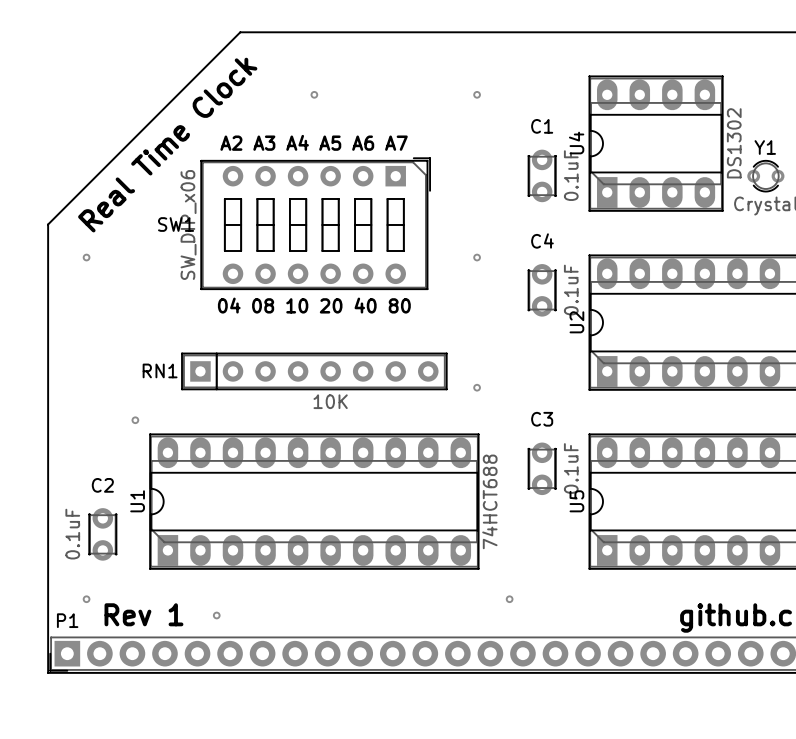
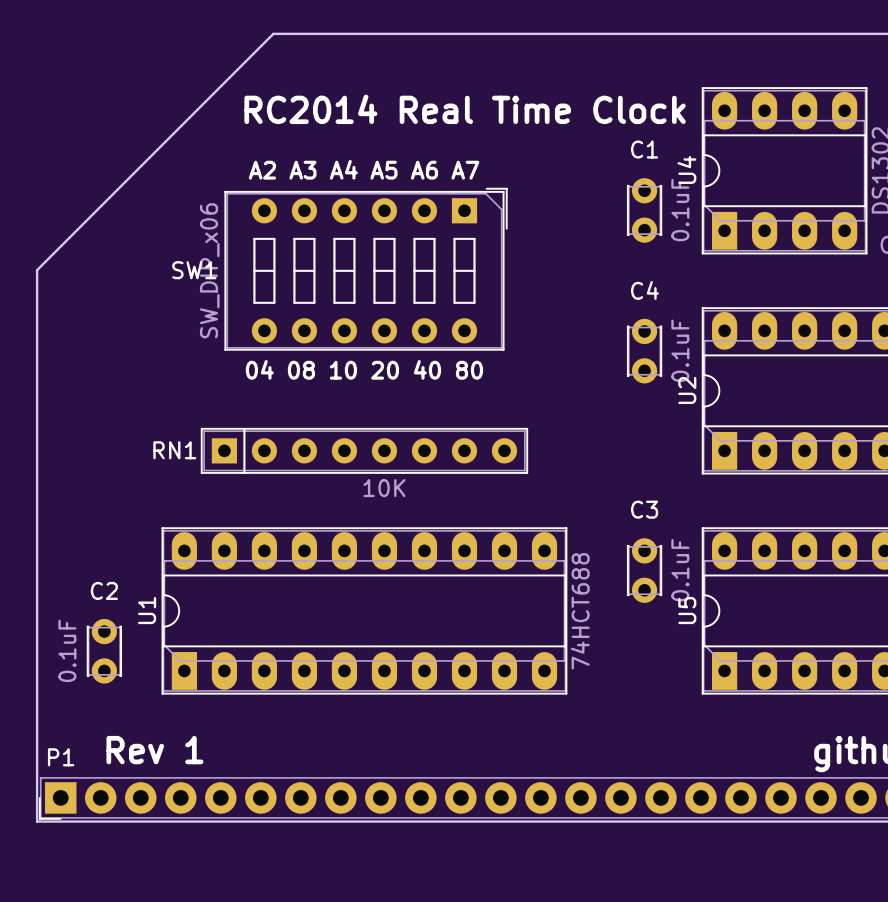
part: (314, 94) -> none
part: (477, 94) -> none
text: Real Time Clock (167, 145) -> RC2014 Real Time Clock (465, 109)
part: (86, 257) -> none
part: (477, 257) -> none
part: (477, 387) -> none
part: (135, 420) -> none
part: (86, 599) -> none
part: (509, 599) -> none
part: (216, 615) -> none

